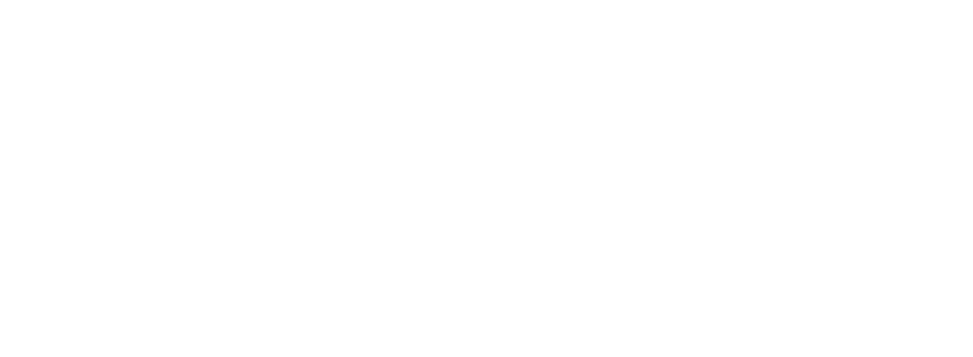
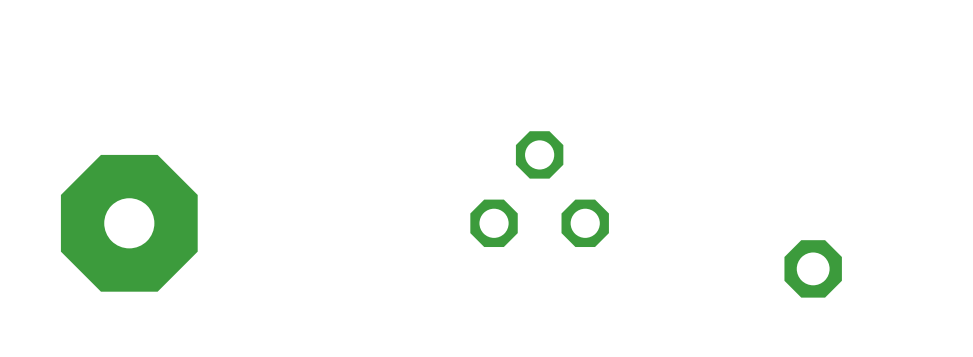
part: none -> (539, 189)
part: none -> (129, 223)
part: none -> (813, 268)

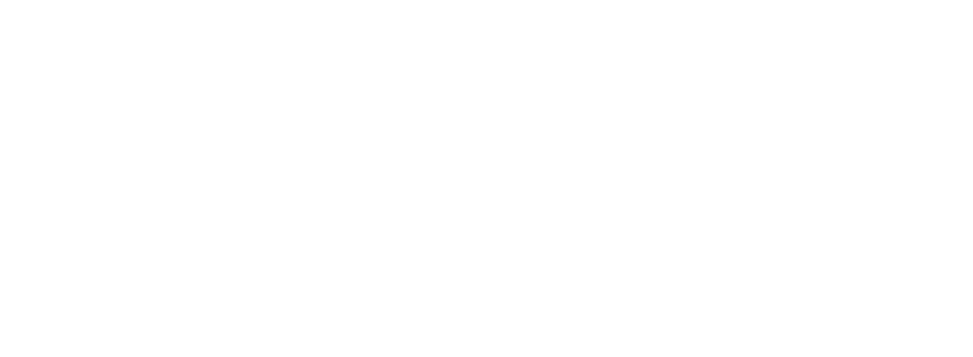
part: (539, 189) -> none
part: (129, 223) -> none
part: (813, 268) -> none

